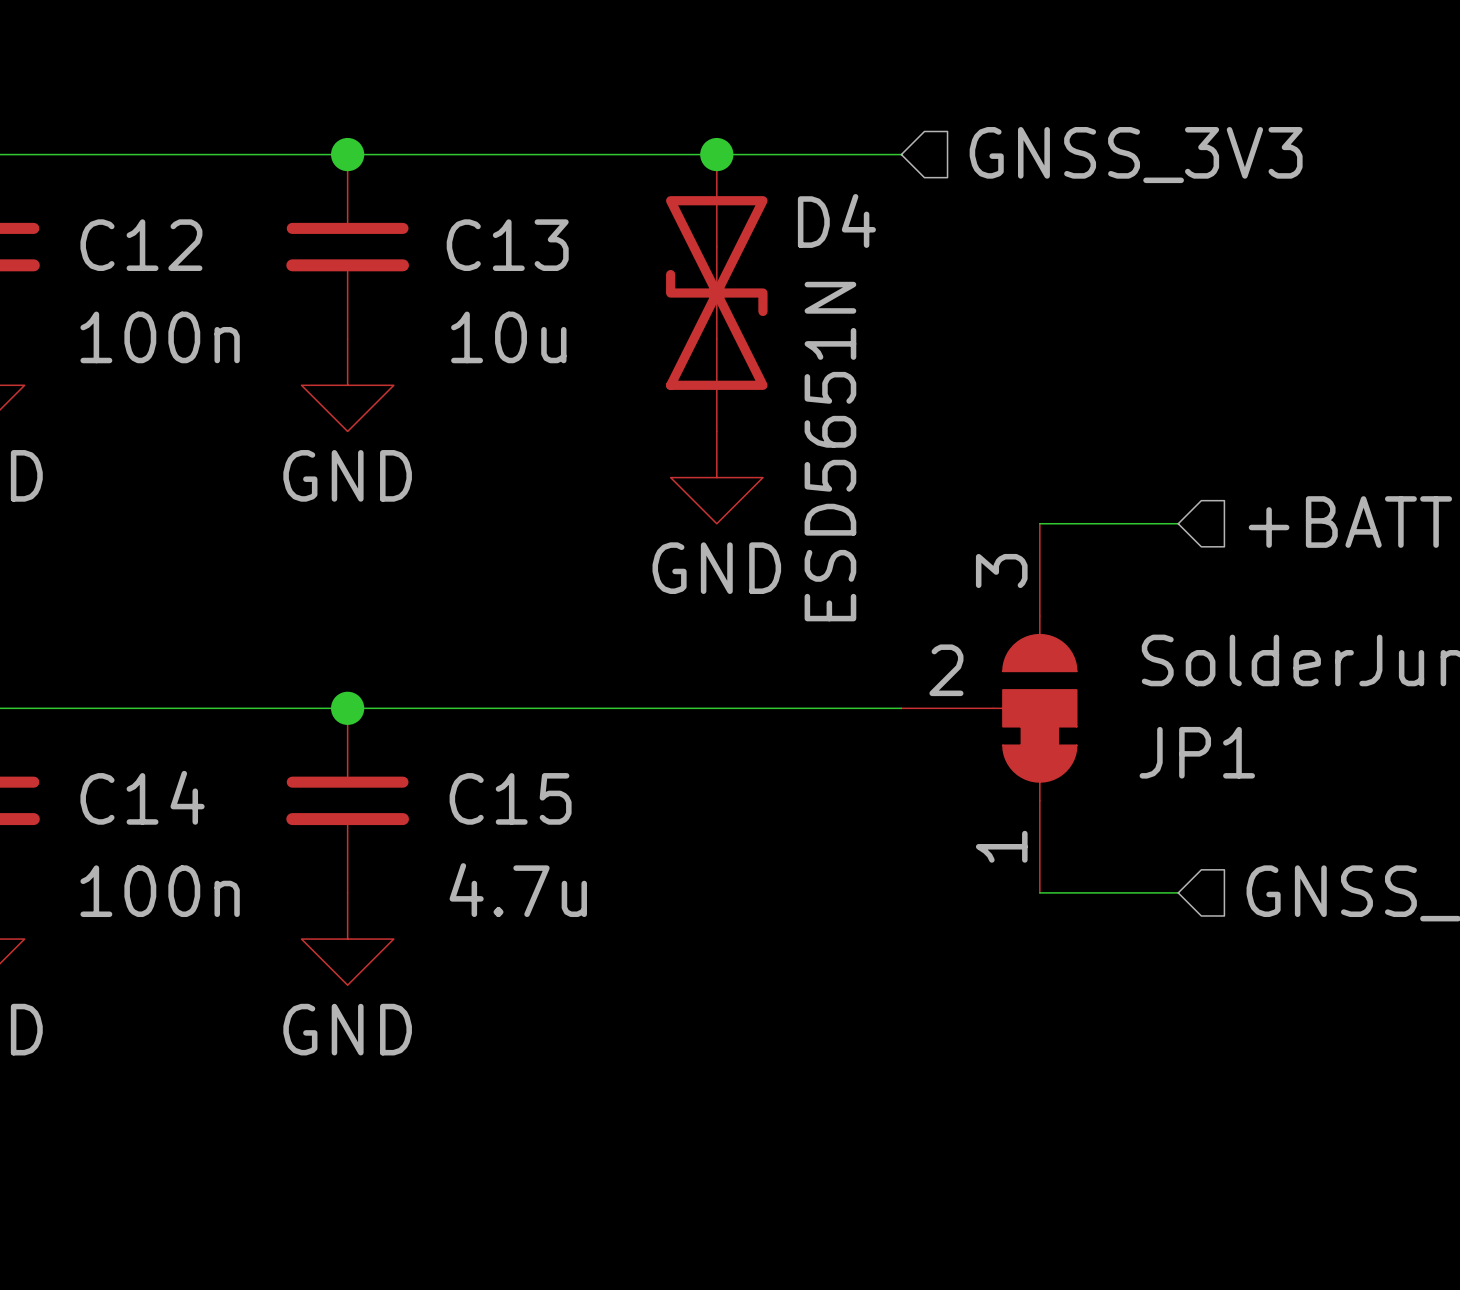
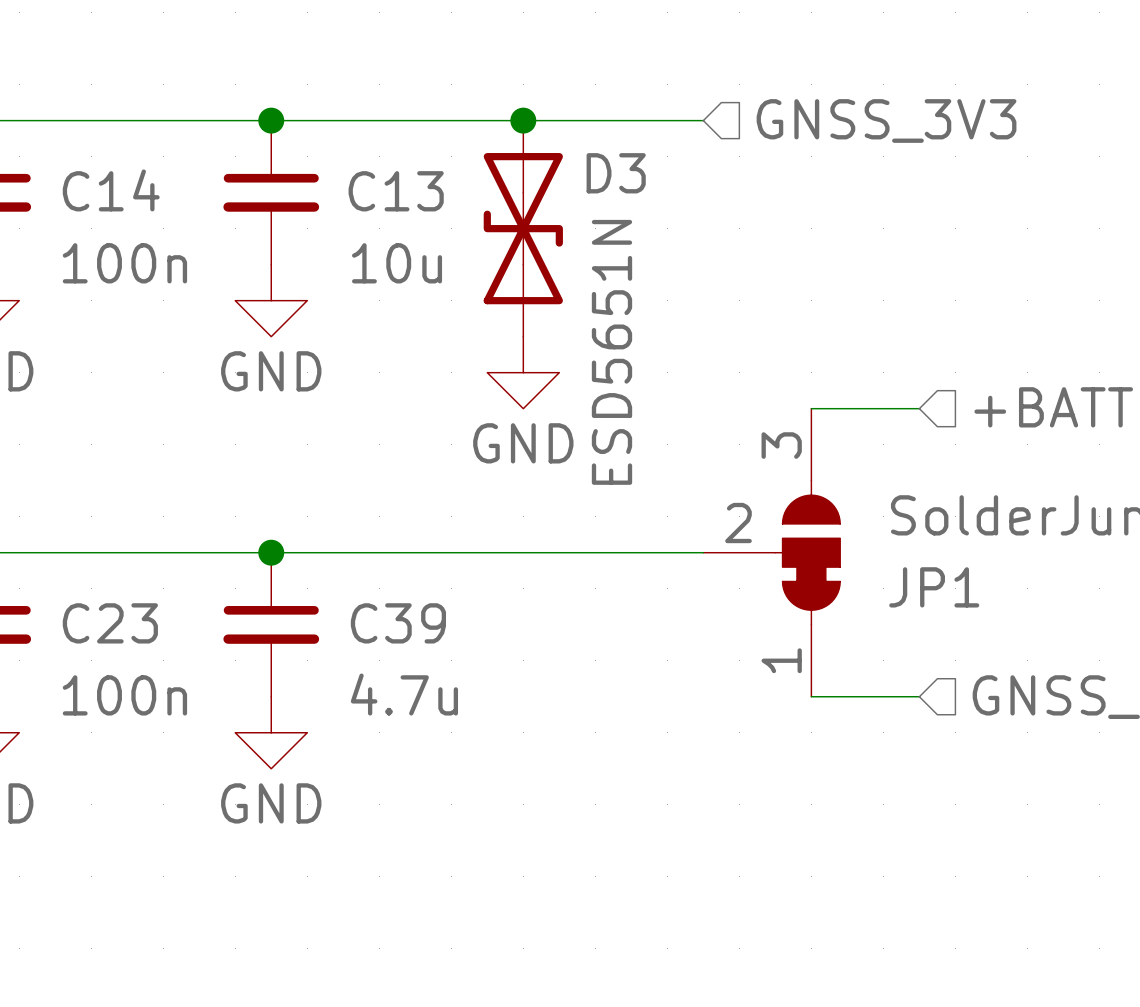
junction position: (716, 154) -> (523, 120)
C12 name: C12 (141, 245) -> C14 (111, 190)
D3: none -> ESD5651N (523, 228)
D4: ESD5651N (716, 293) -> none
power symbol position: GND (716, 477) -> GND (523, 372)
C14 name: C14 (142, 797) -> C23 (110, 623)
C15 name: C15 (510, 798) -> C39 (398, 623)

